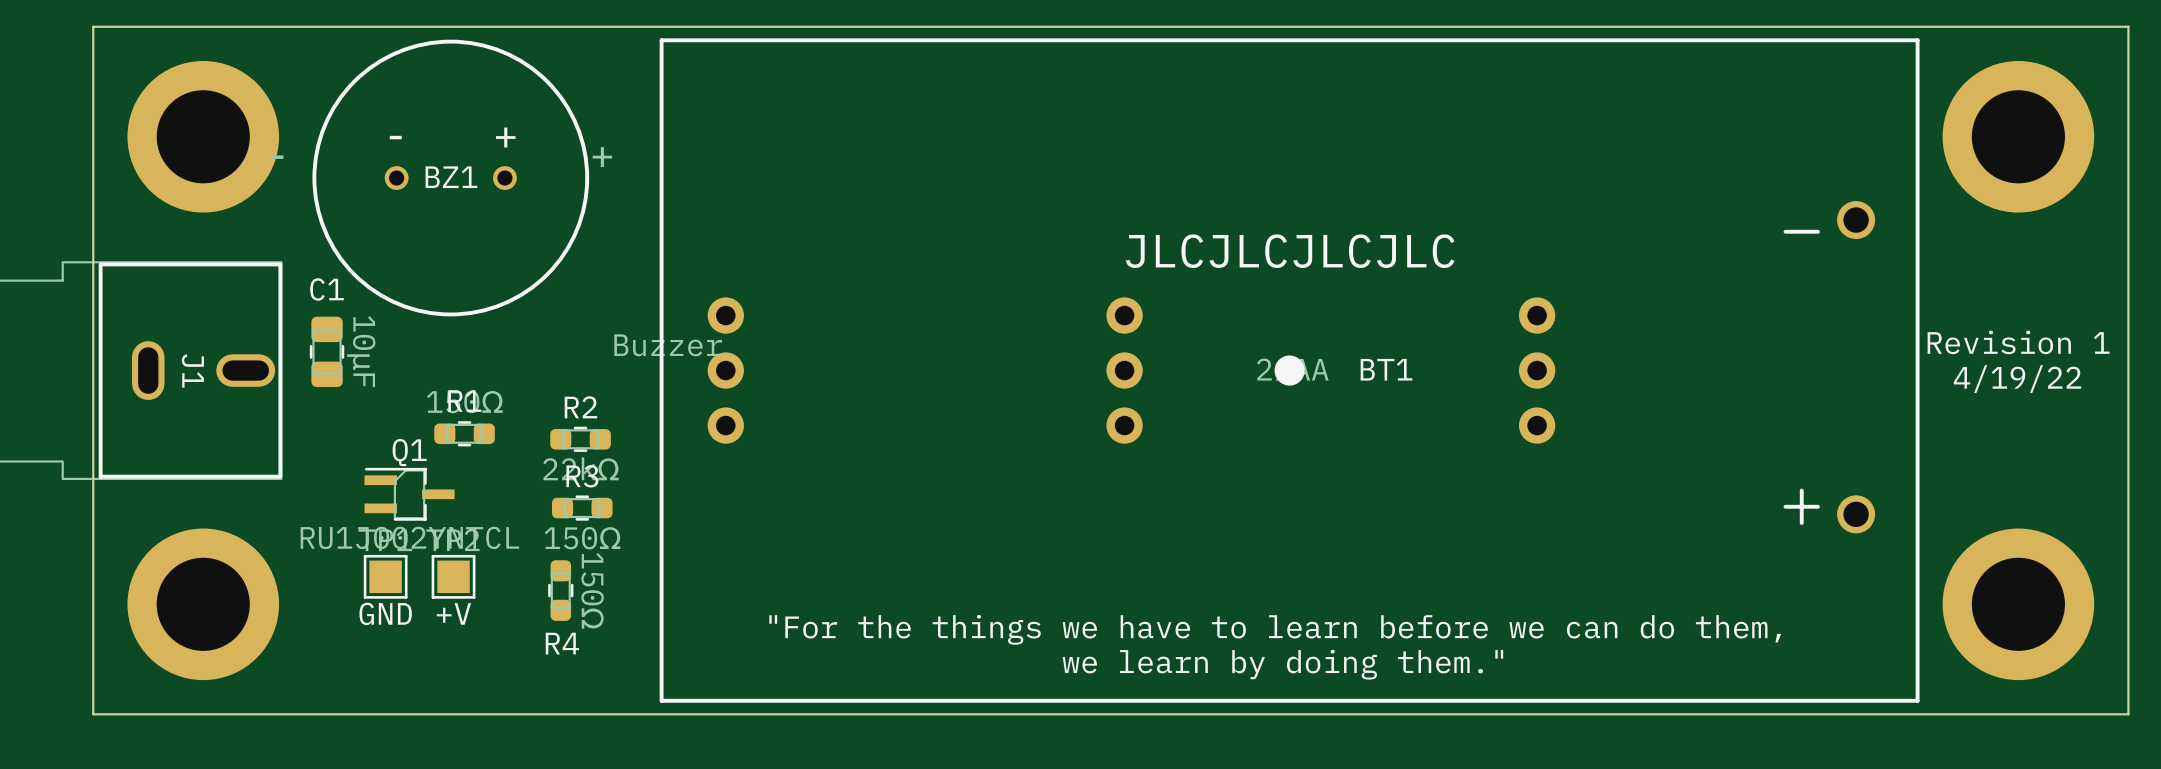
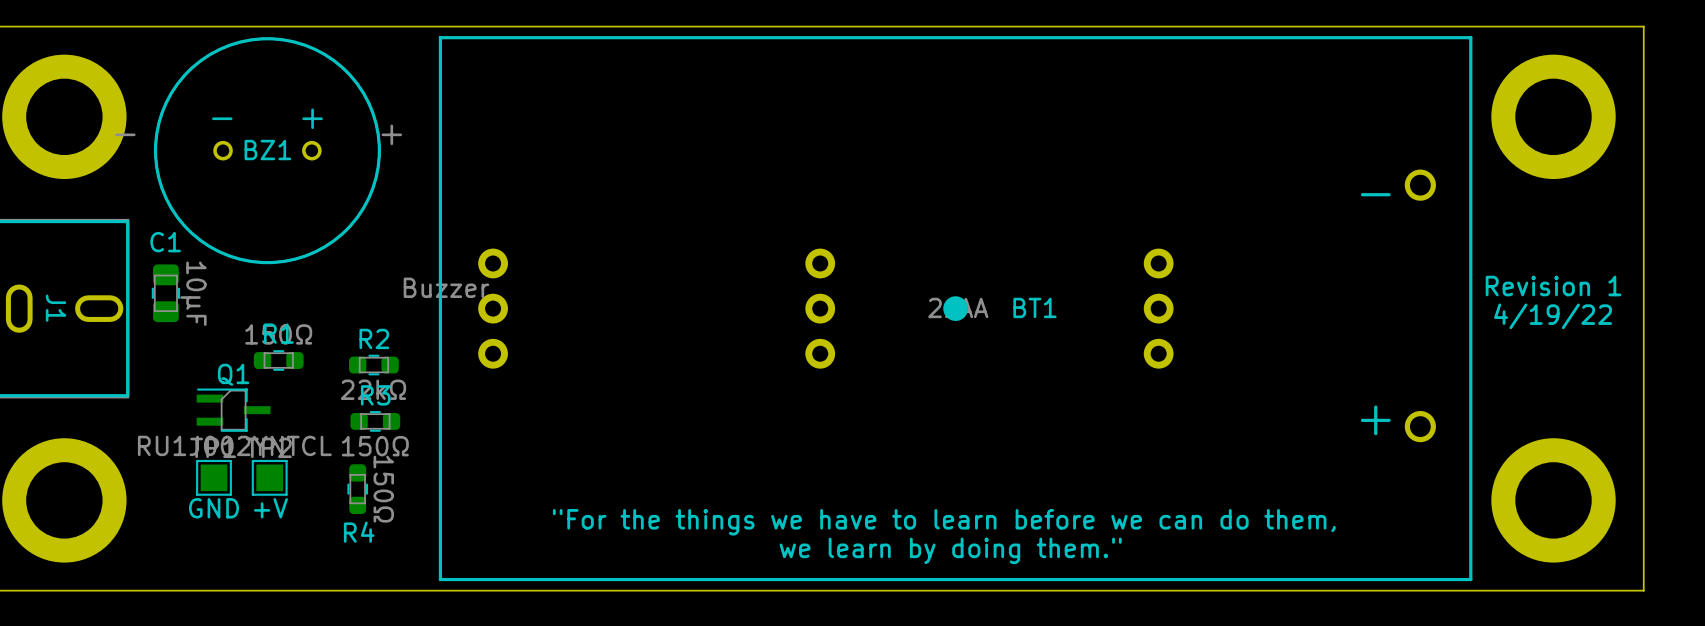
text: JLCJLCJLCJLC (1290, 251) -> none

